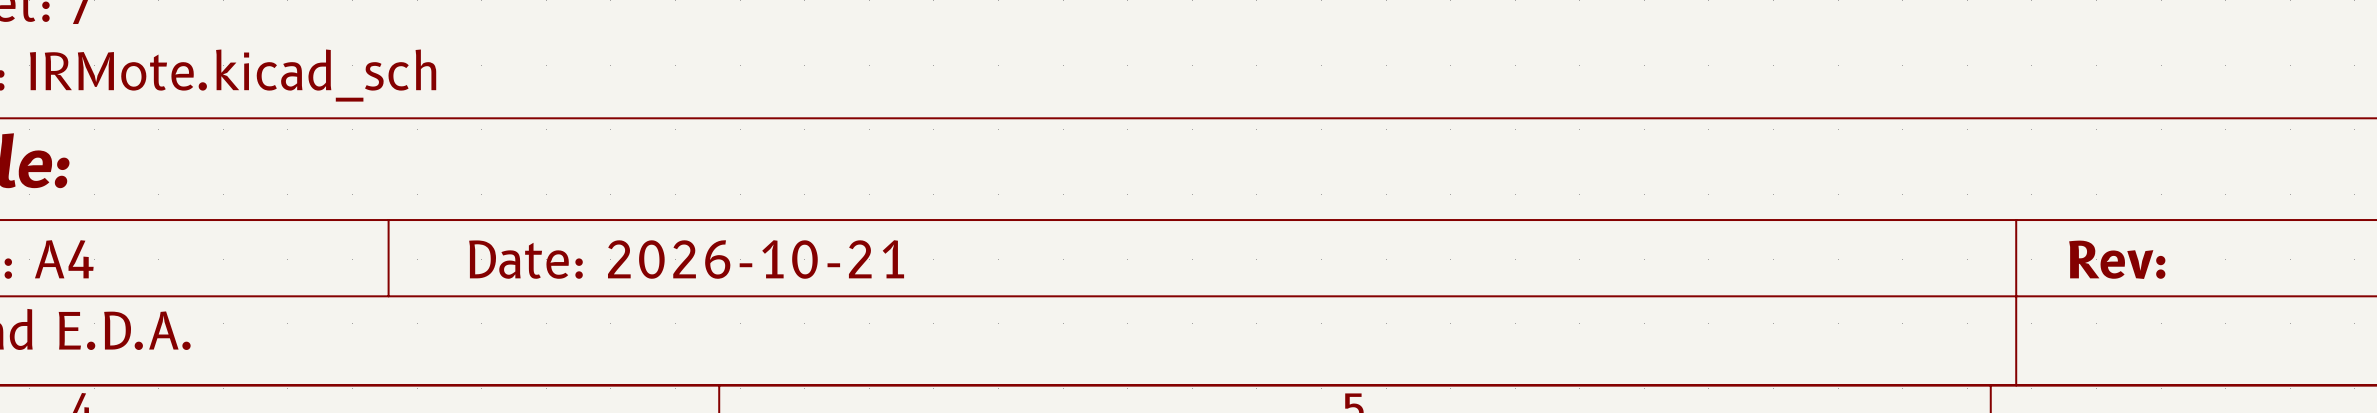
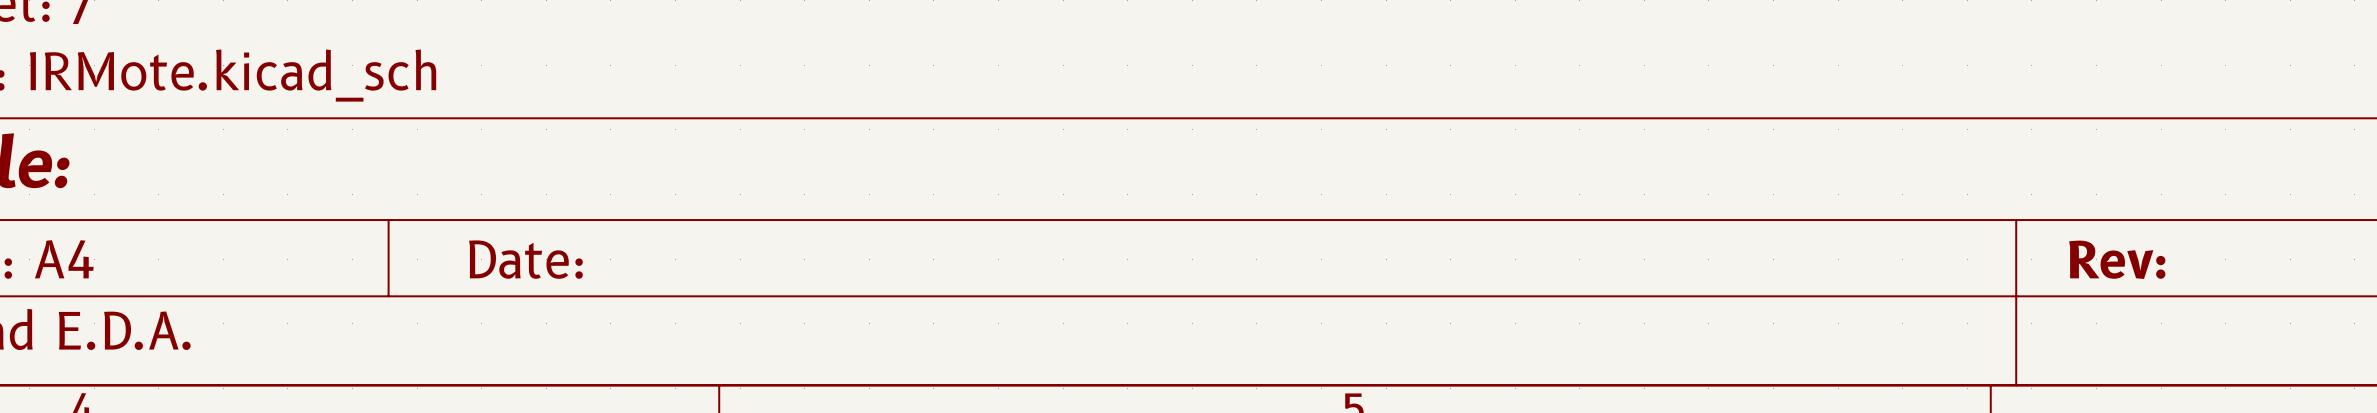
title block: Date: 2026-10-21 (686, 259) -> Date: (525, 259)

